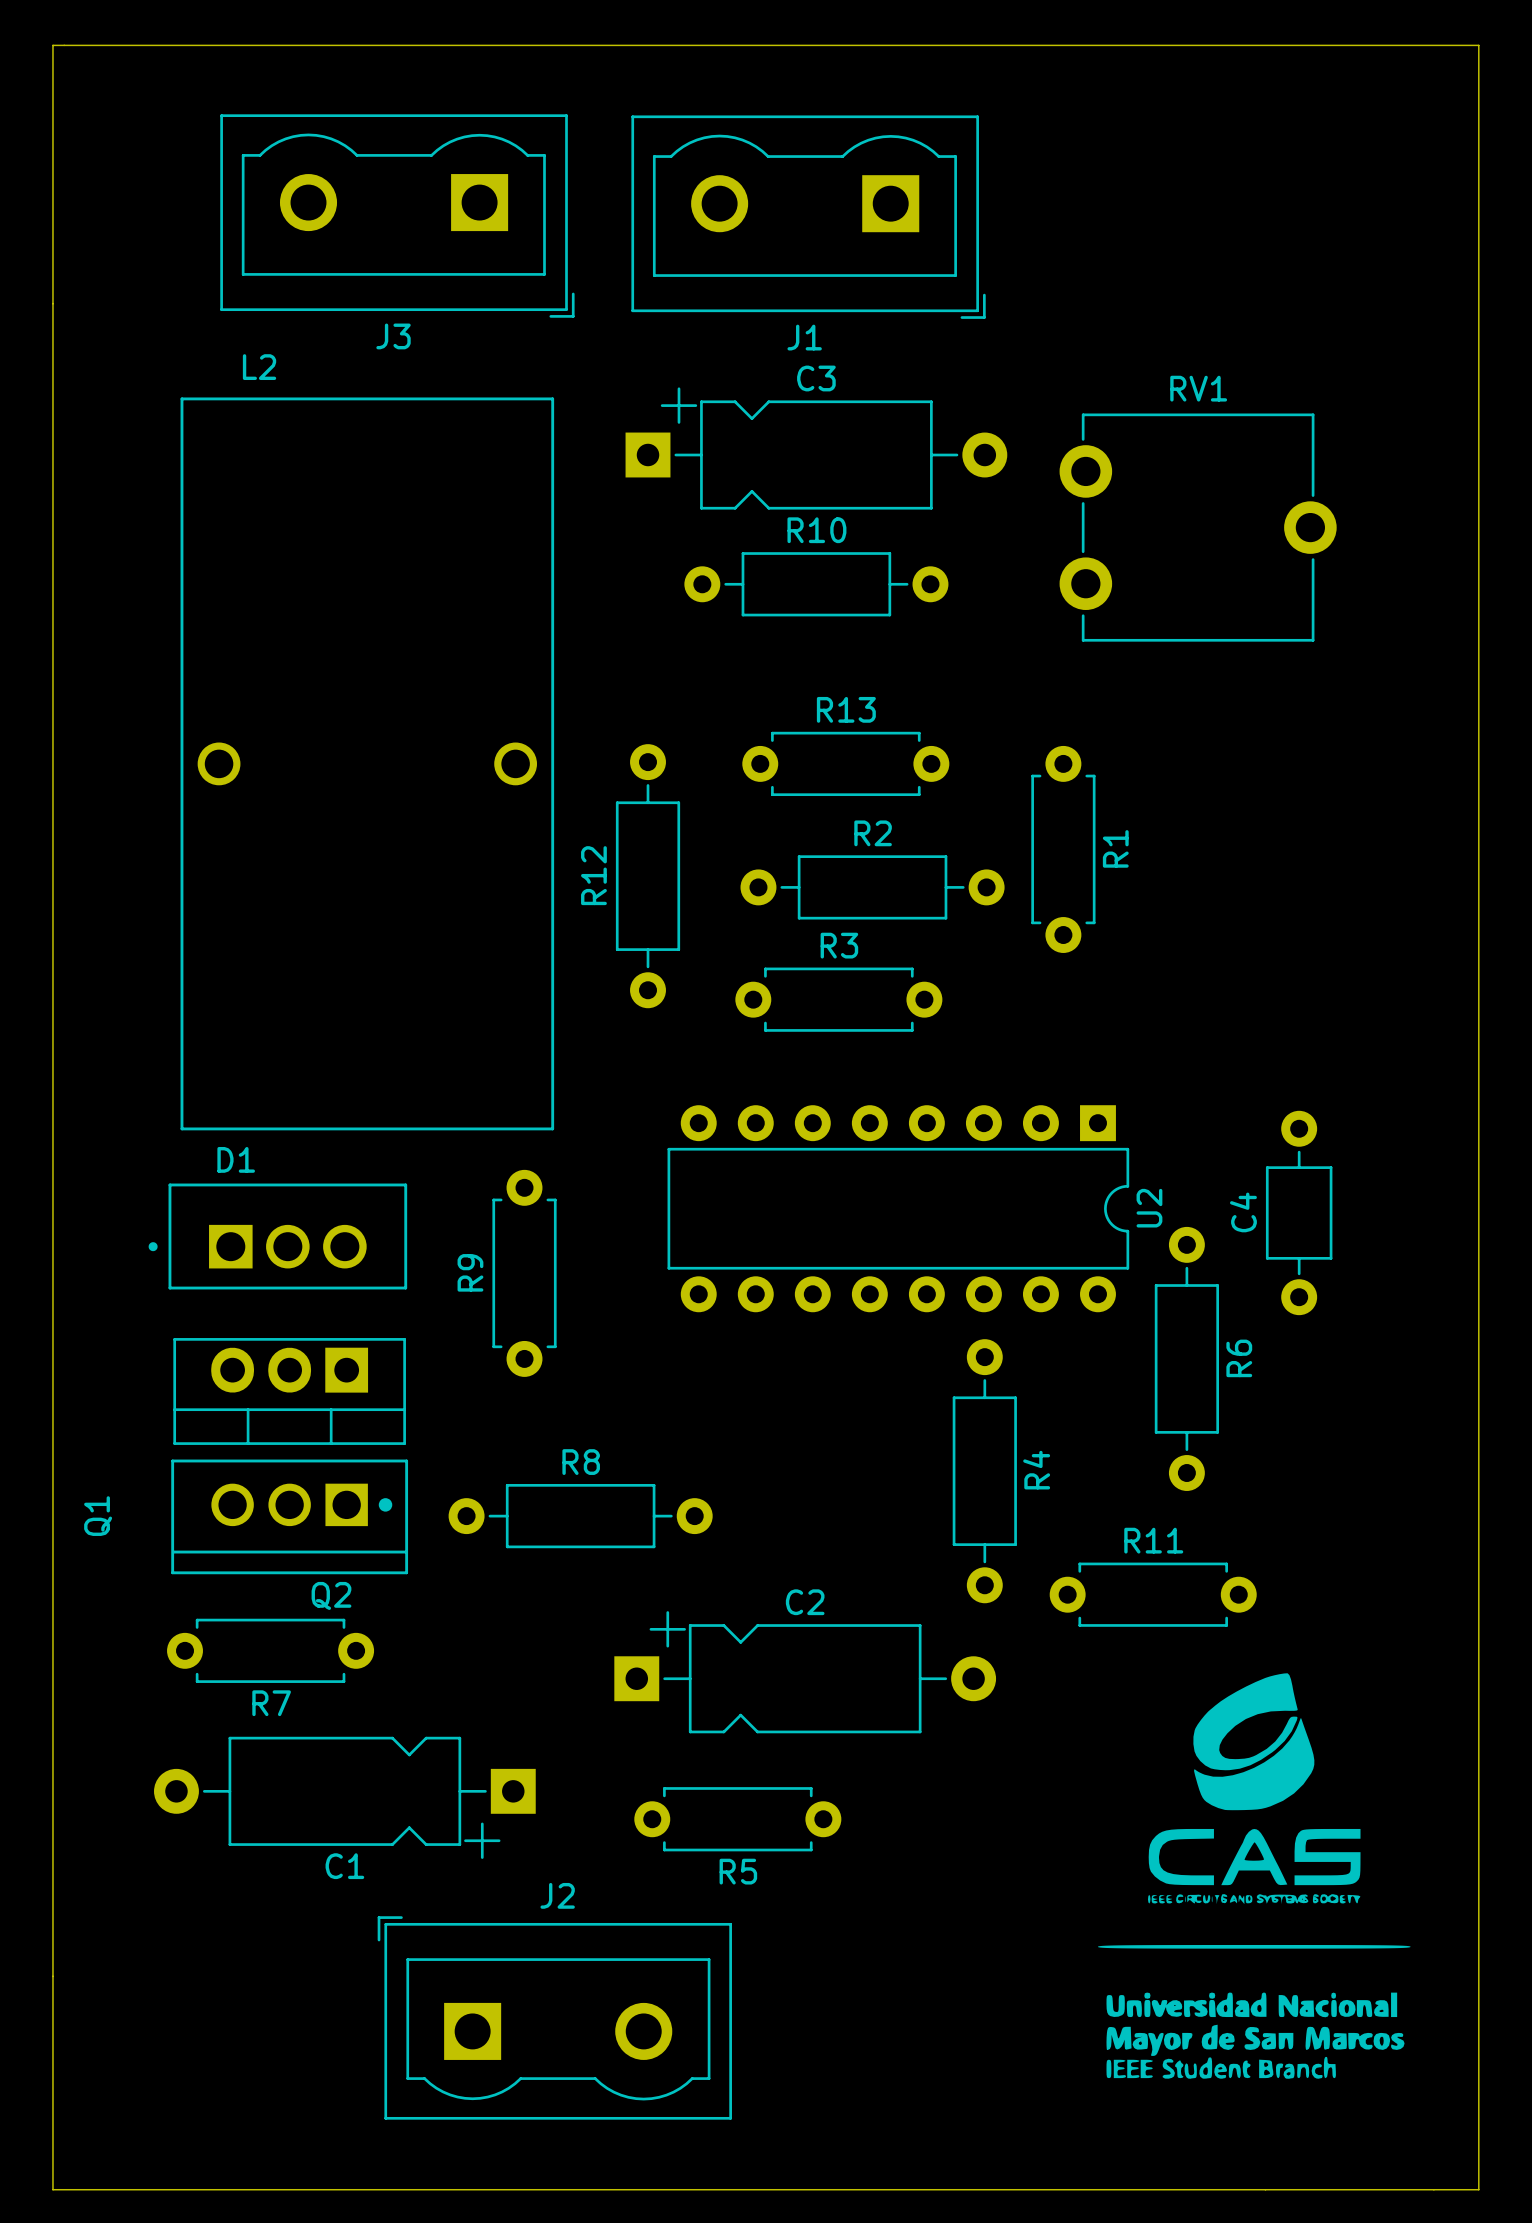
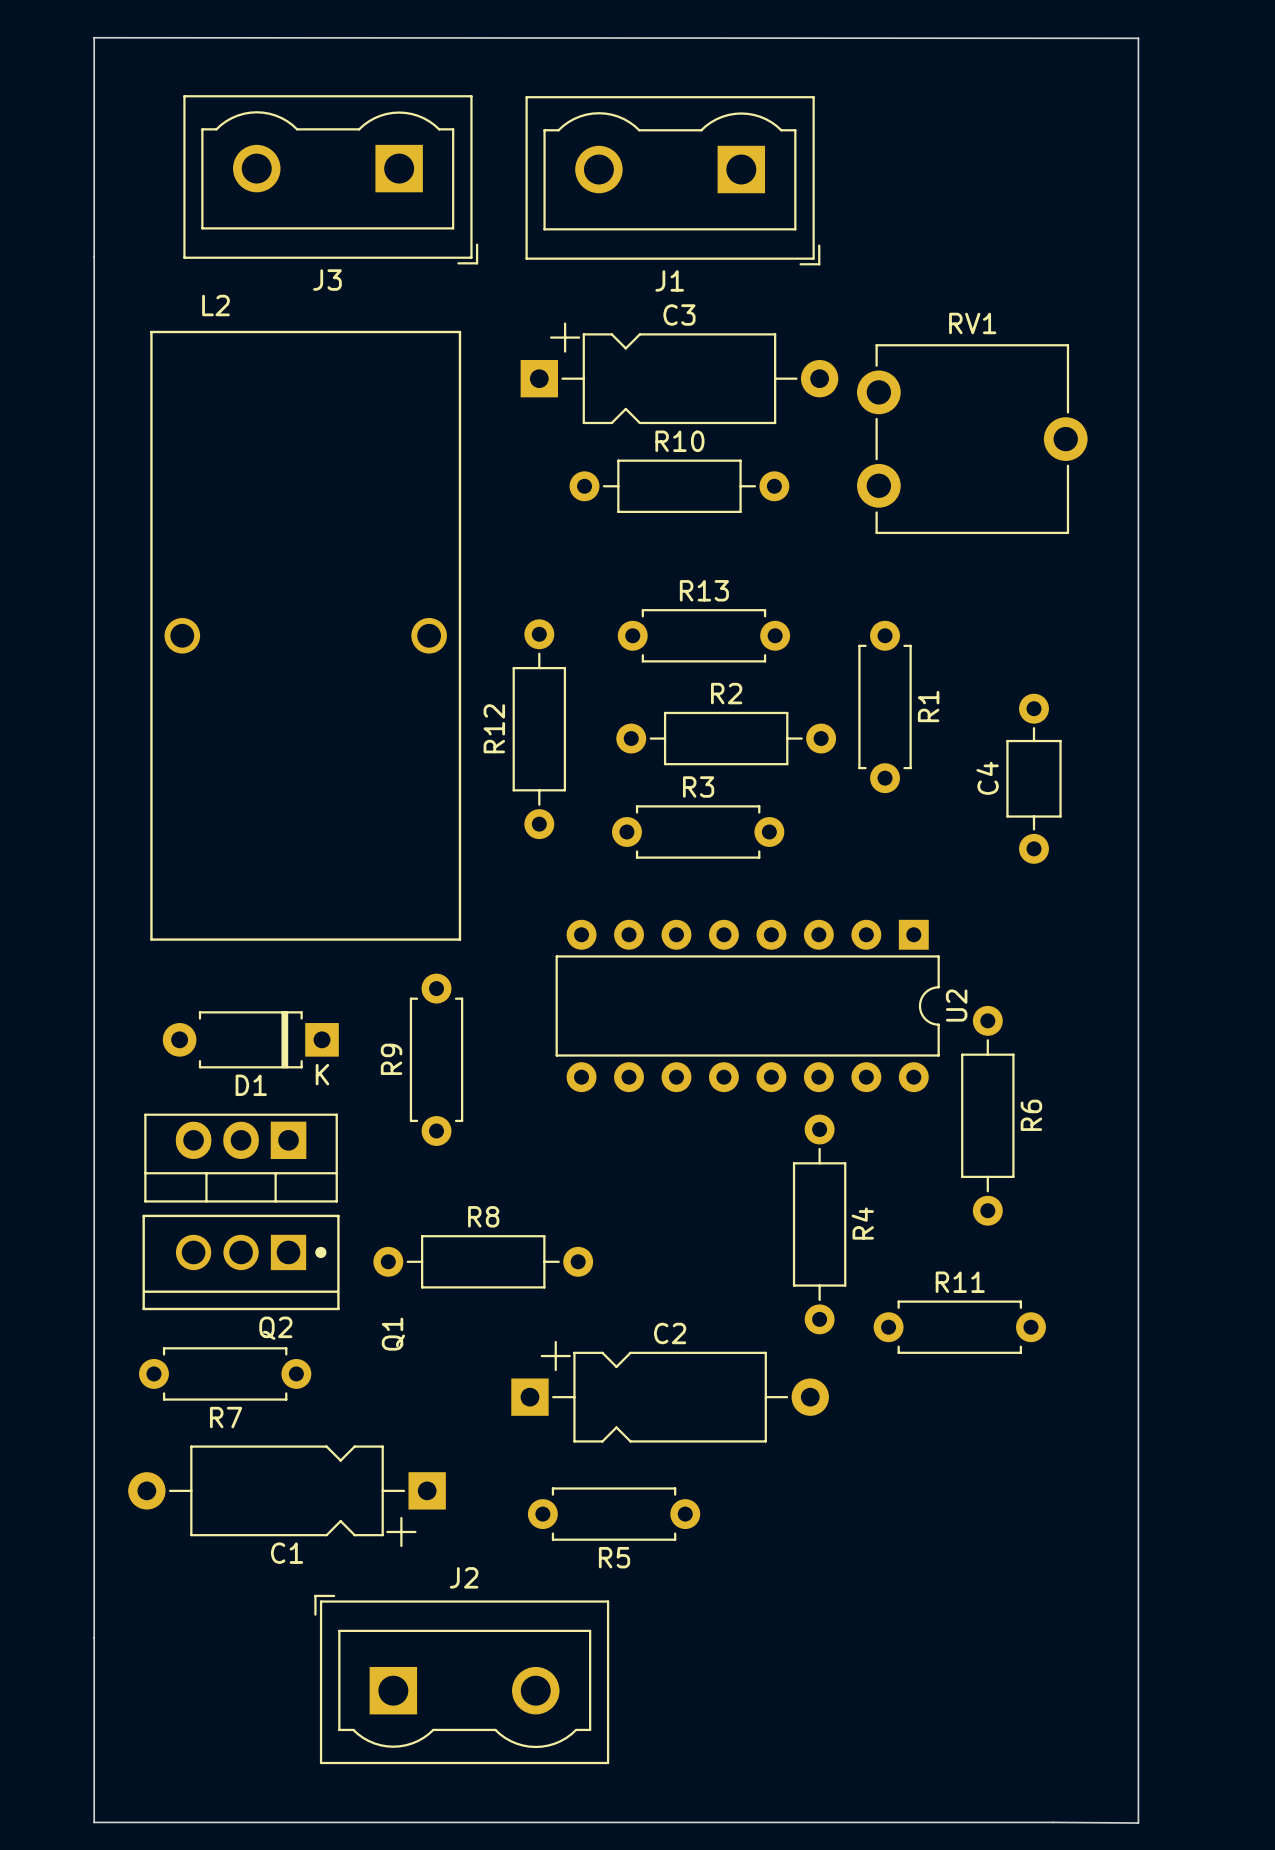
RV1 position: (1198, 527) -> (972, 439)
D1 name position: D1 (236, 1159) -> D1 (251, 1085)
D1 footprint: [148, 1183, 408, 1290] -> [162, 1011, 339, 1069]
C4 position: (1299, 1212) -> (1034, 778)
R6 position: (1186, 1358) -> (987, 1115)
Q1 name position: Q1 (98, 1516) -> Q1 (393, 1334)
drawing: [1097, 1673, 1411, 2079] -> none
board edge: (113, 2189) (52, 2189) (52, 45) (1478, 45) (1478, 2189) (1265, 2189) -> (94, 1822) (94, 37) (1138, 38) (1138, 1823) (1053, 1822)

